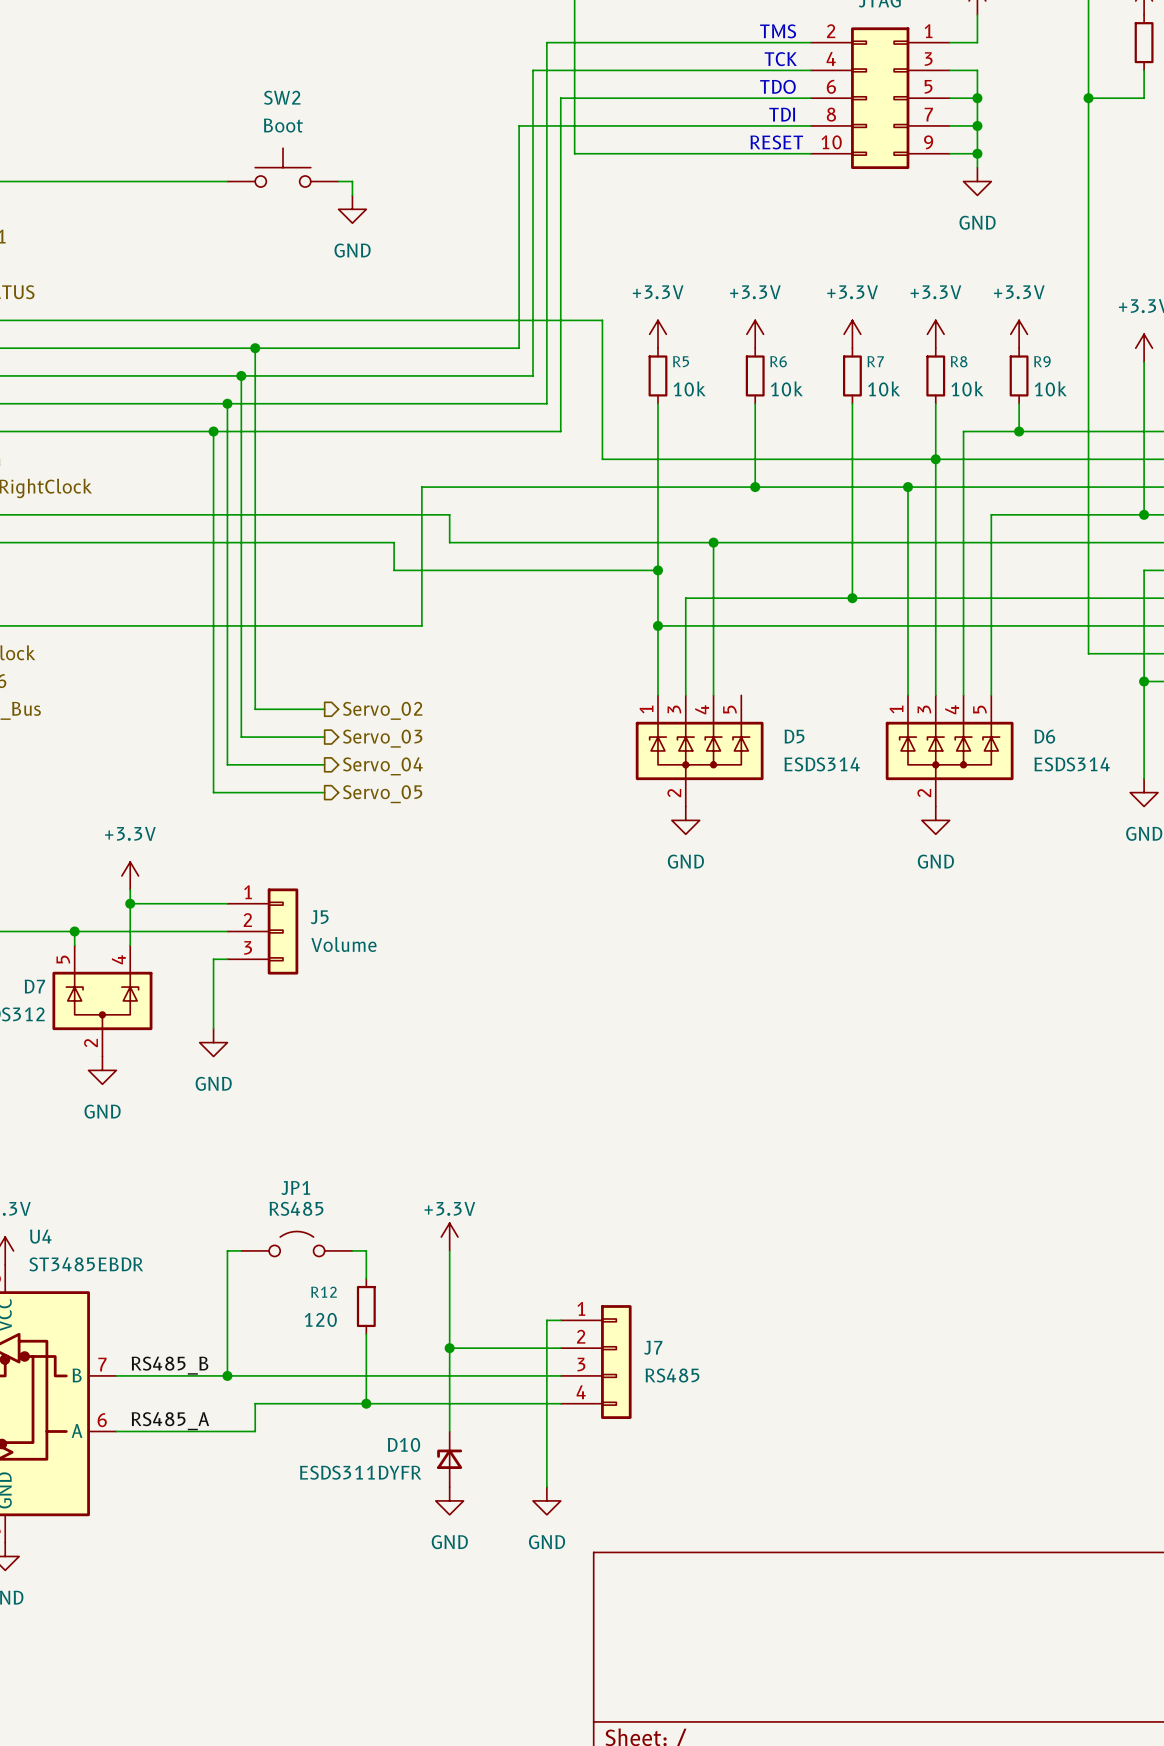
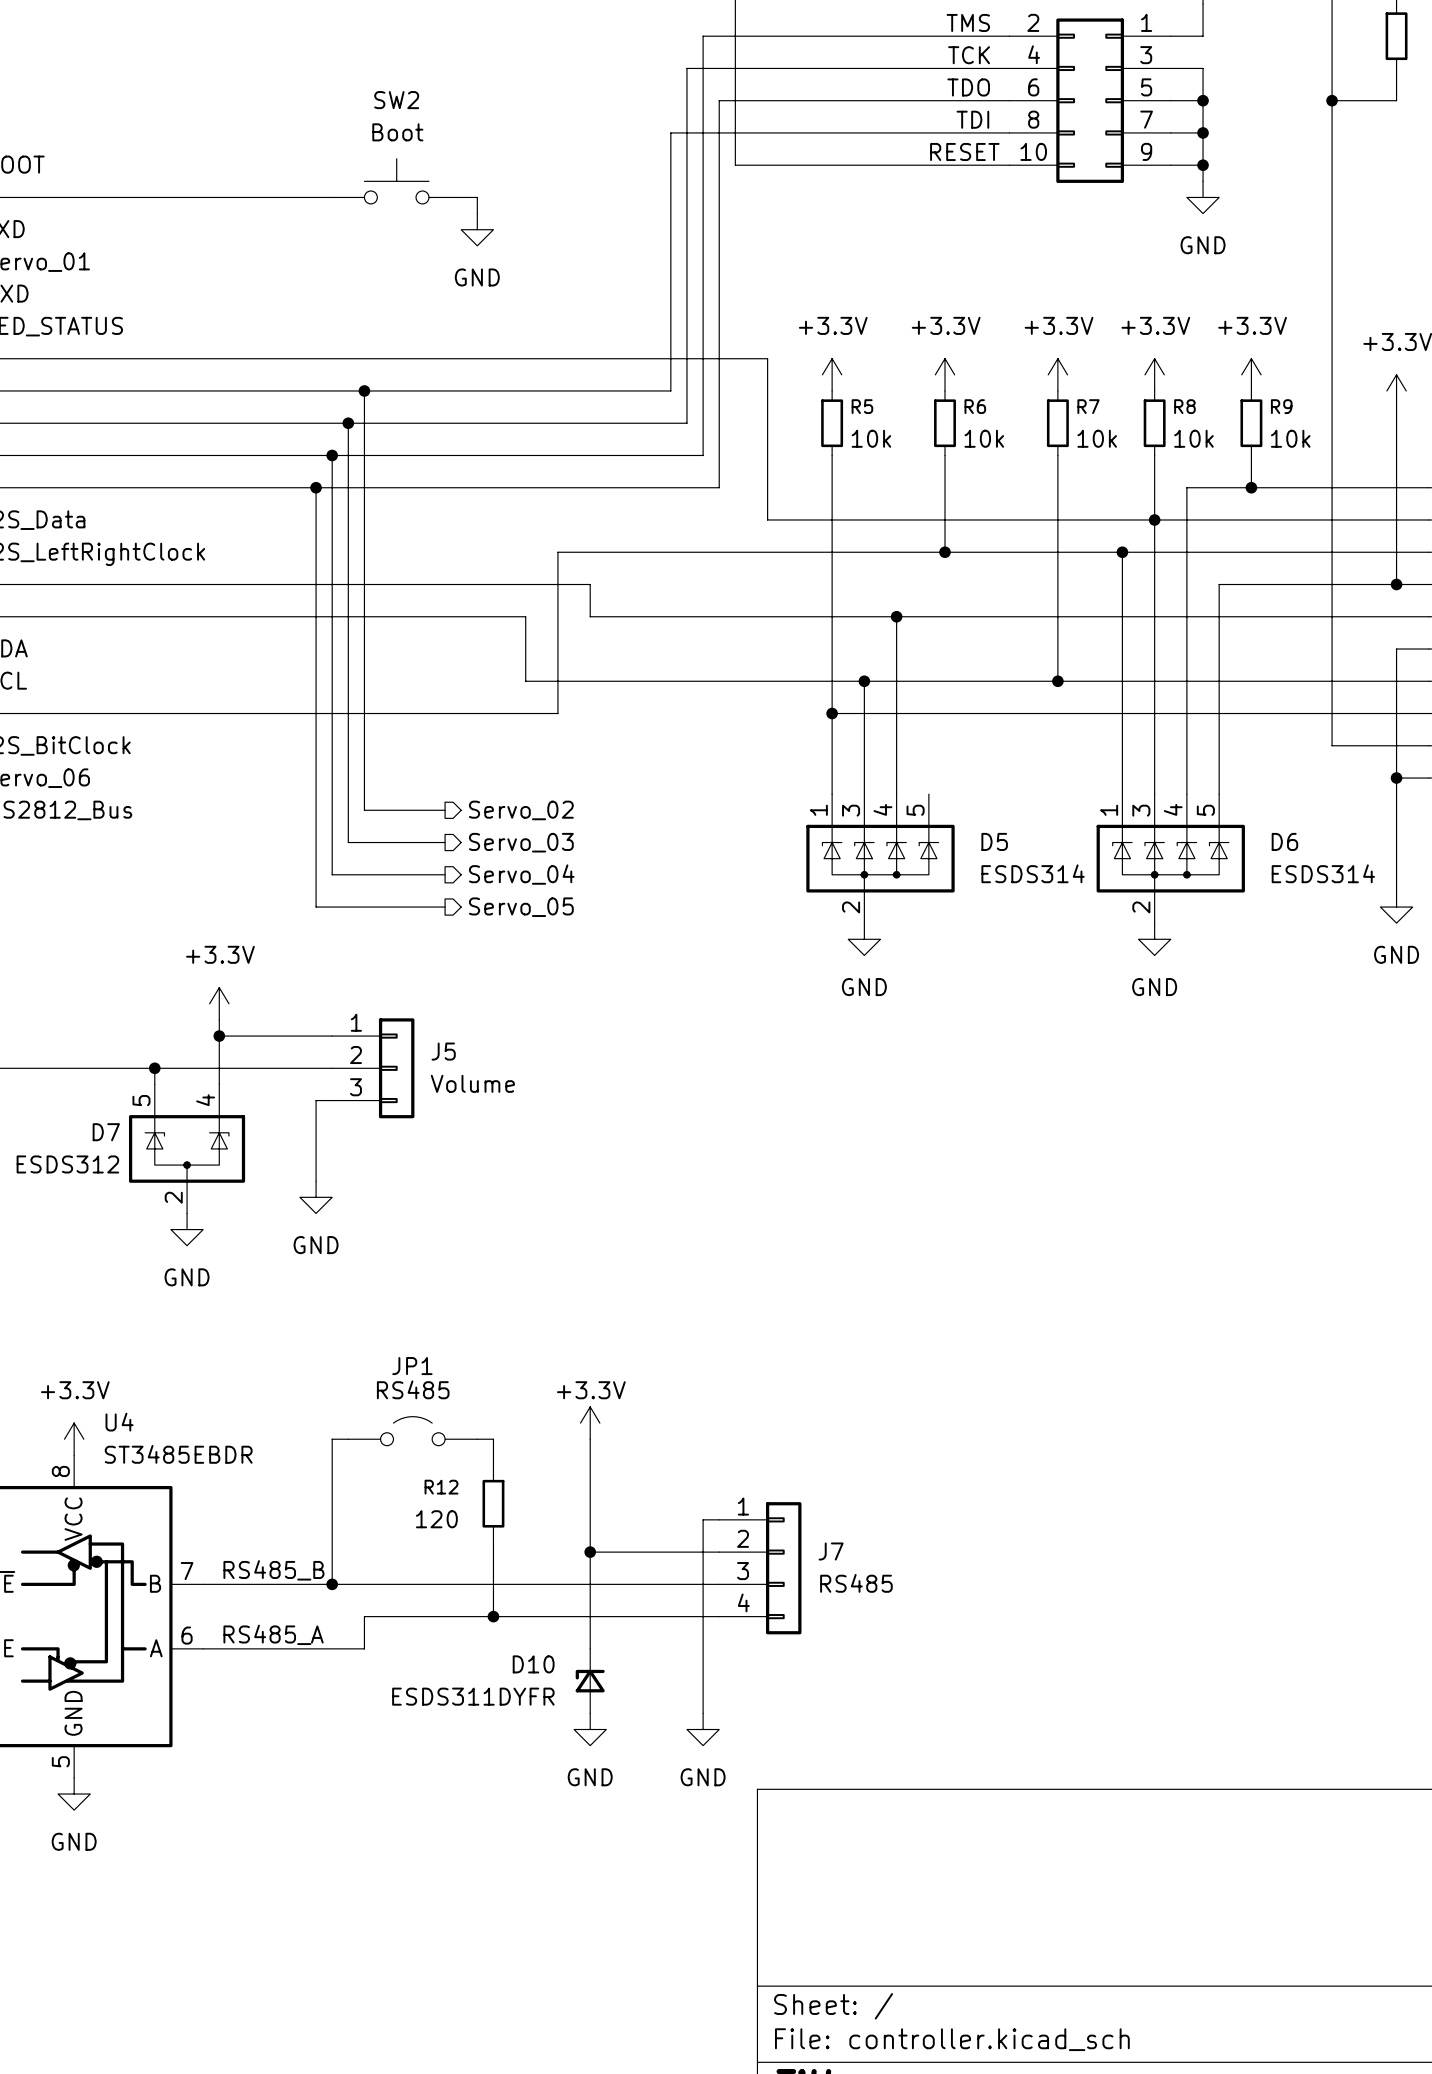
wire: (394, 570) (657, 570) -> (525, 649) (525, 681) (864, 681)
junction position: (657, 570) -> (864, 681)

